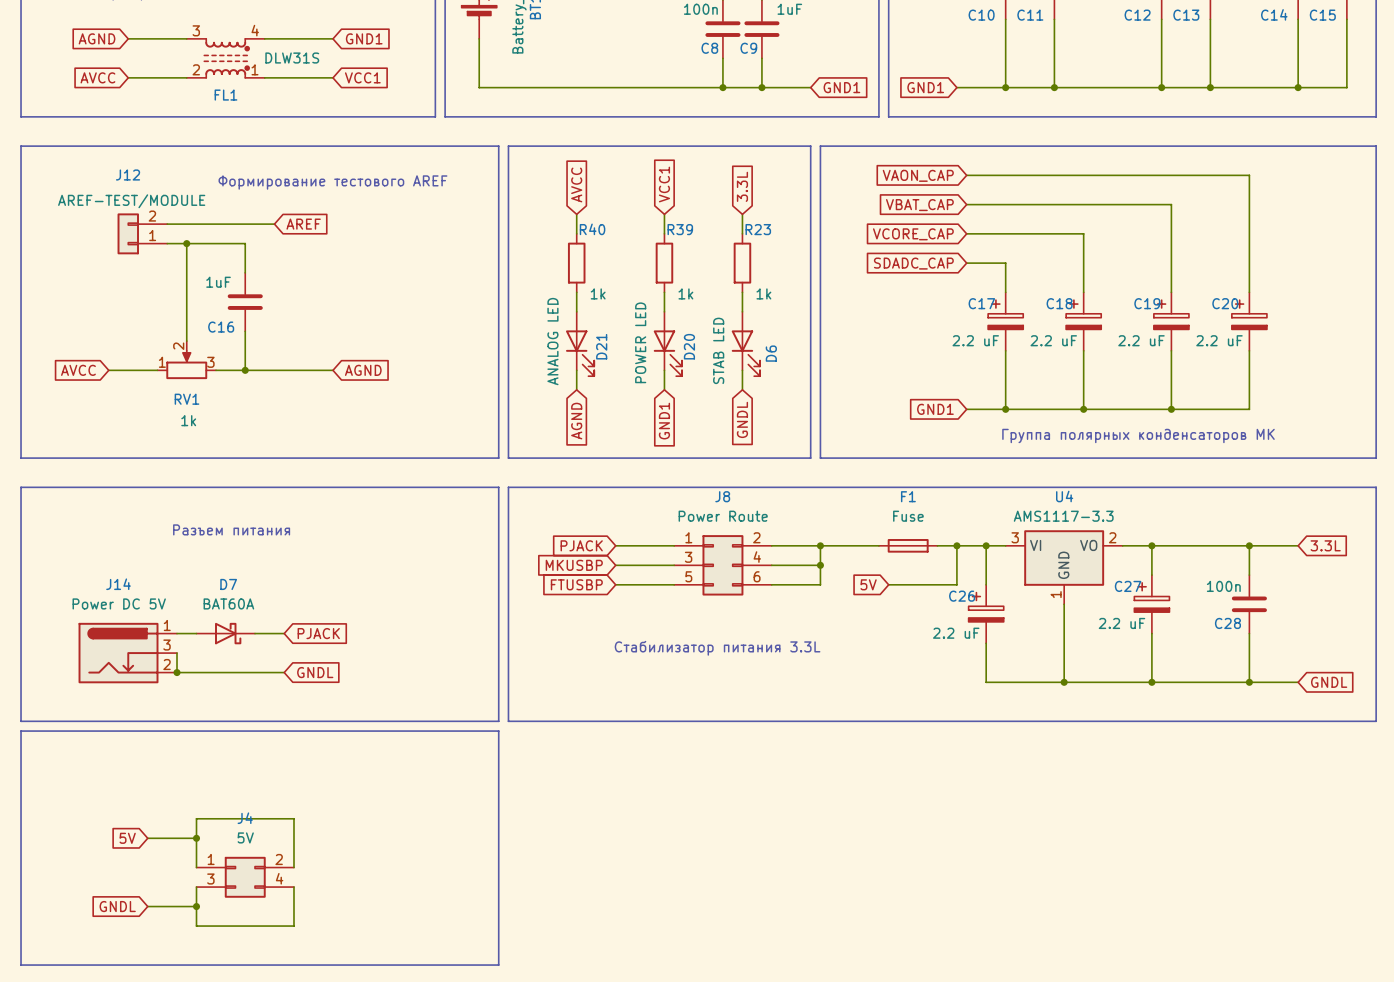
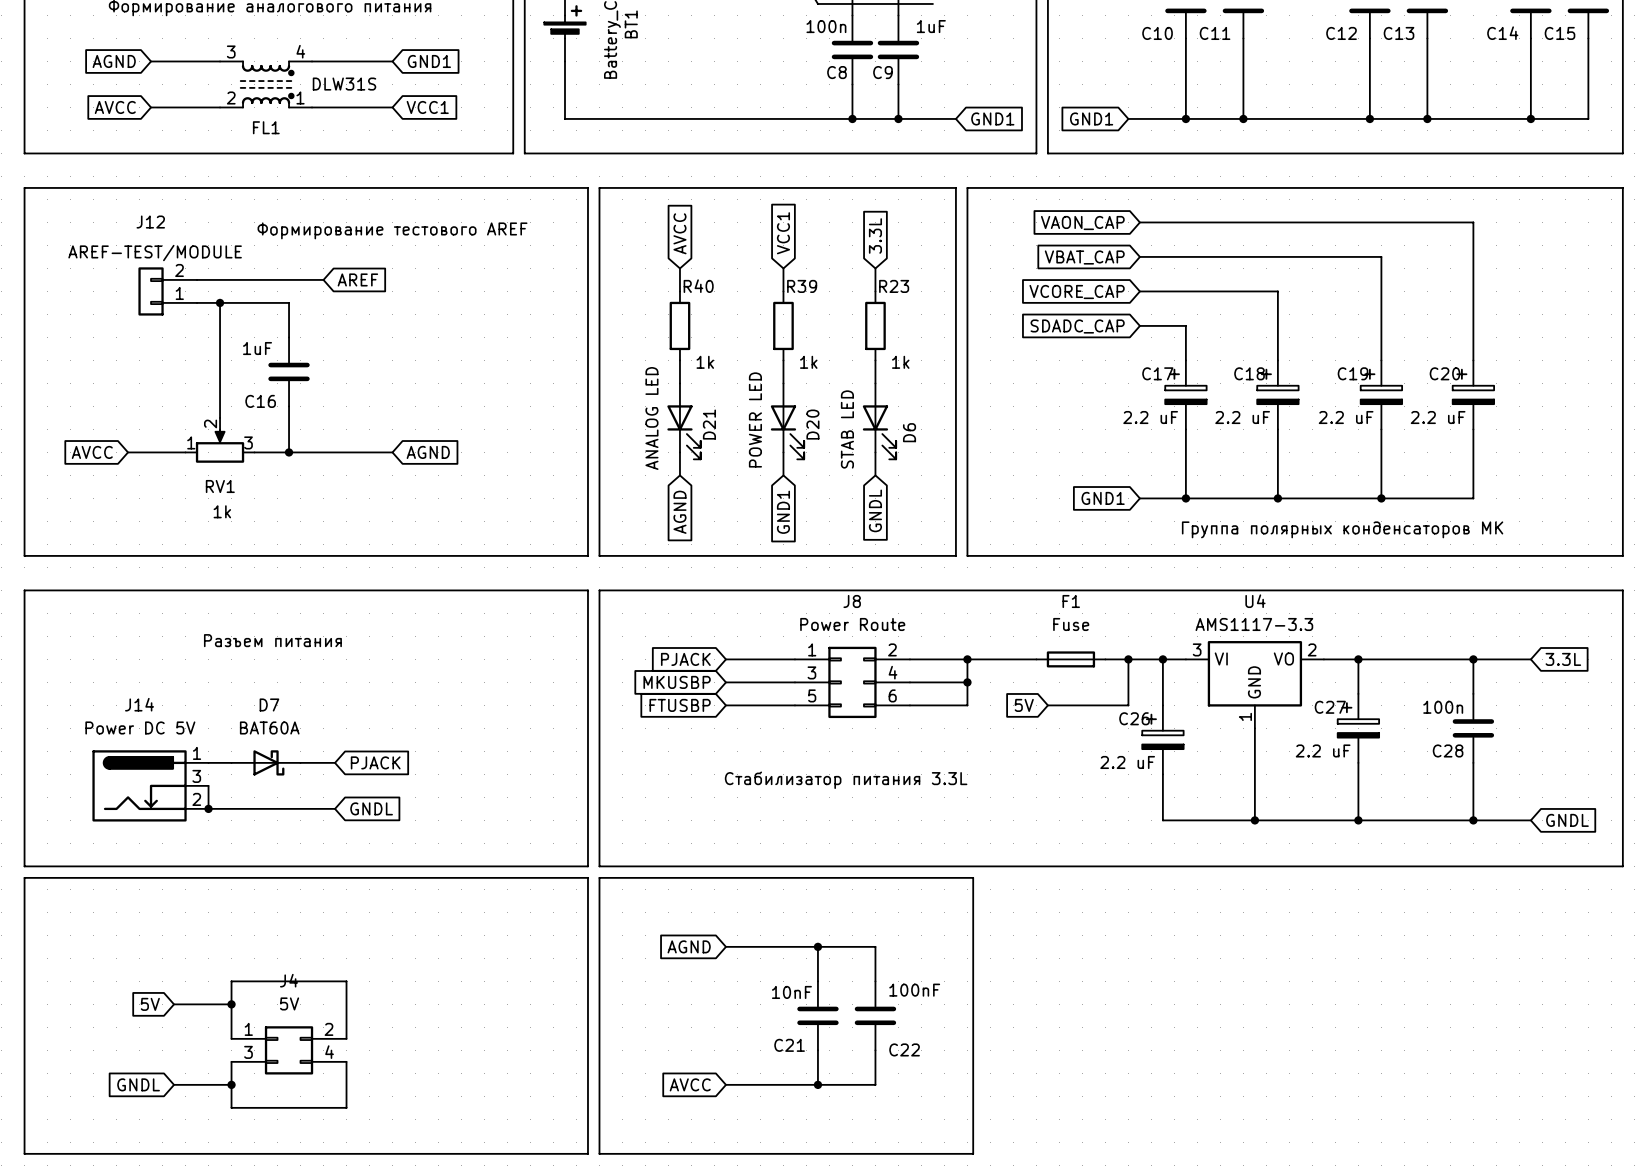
line: none -> (599, 877) (973, 877) (973, 1153) (599, 1153) (599, 877)
global label: none -> AGND (689, 946)
wire: none -> (725, 946) (875, 946) (875, 981)
wire: none -> (817, 946) (817, 981)
junction: none -> (817, 946)
C21: none -> 10nF (817, 1015)
C22: none -> 100nF (875, 1015)
wire: none -> (817, 1050) (817, 1084)
wire: none -> (875, 1050) (875, 1084) (725, 1084)
global label: none -> AVCC (690, 1084)
junction: none -> (817, 1084)

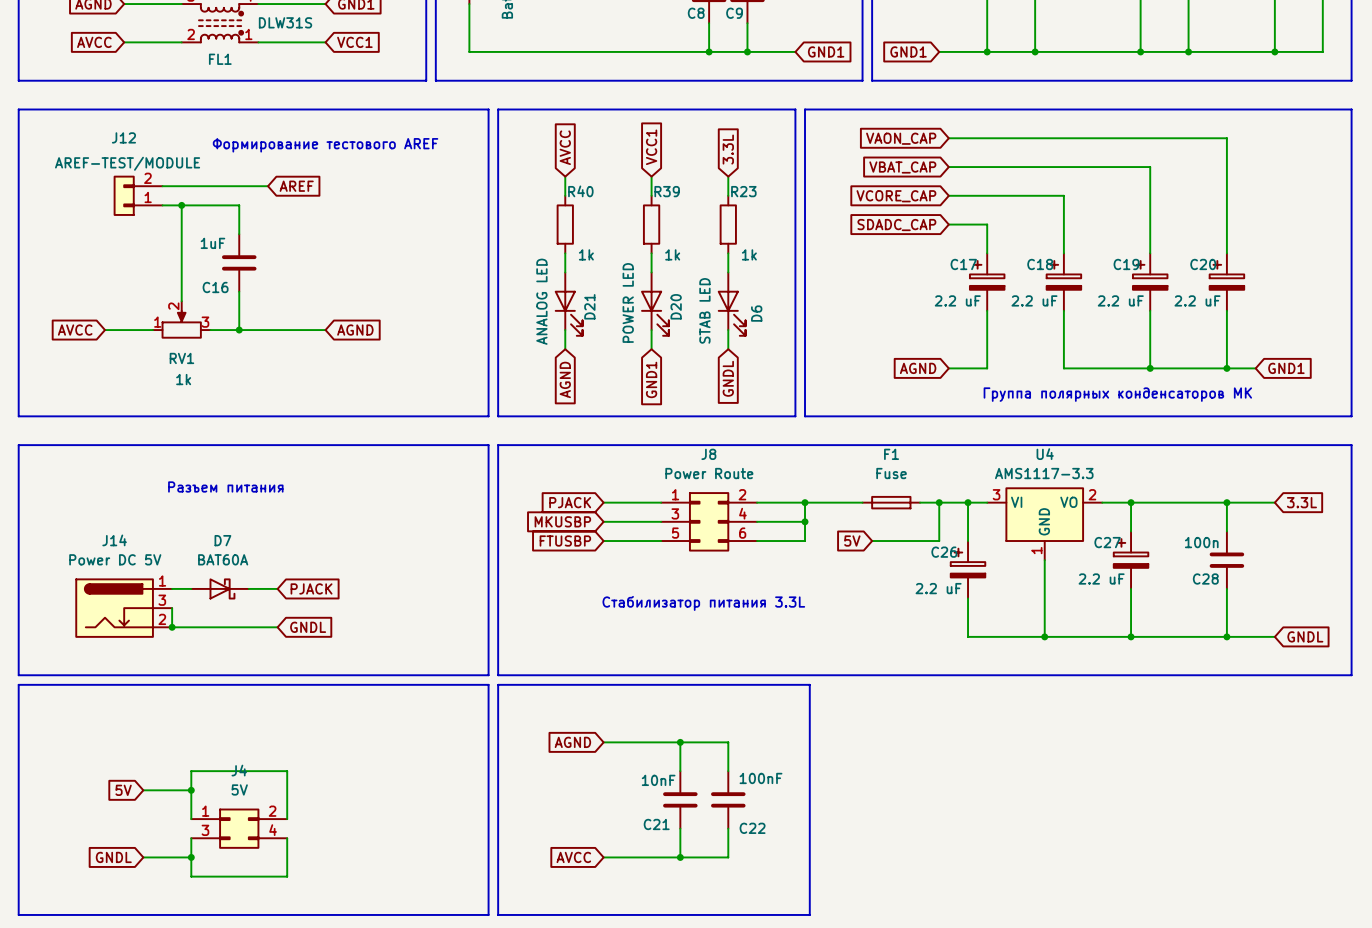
global label: GND1 (1103, 498) -> AGND (918, 368)
wire: (1185, 498) (1277, 498) -> none
junction: (1185, 498) -> none
junction: (1277, 498) -> none
wire: none -> (1226, 368) (1255, 368)
junction: none -> (1226, 368)
global label: none -> GND1 (1286, 368)

